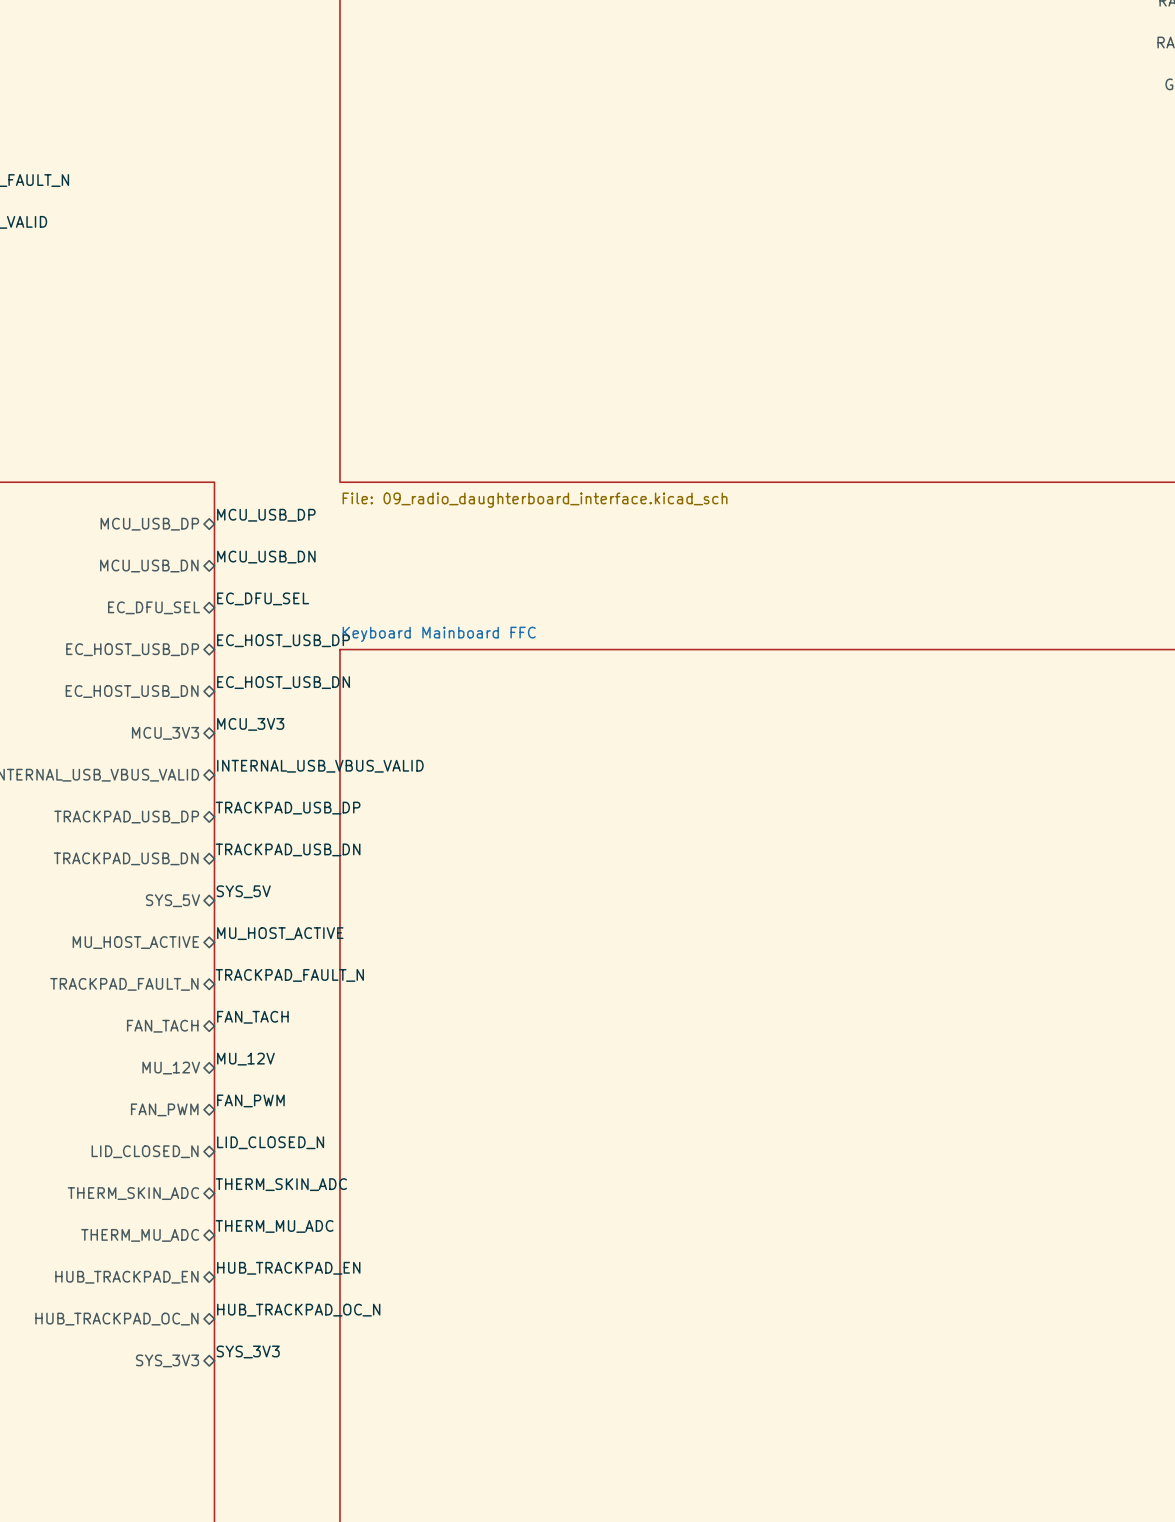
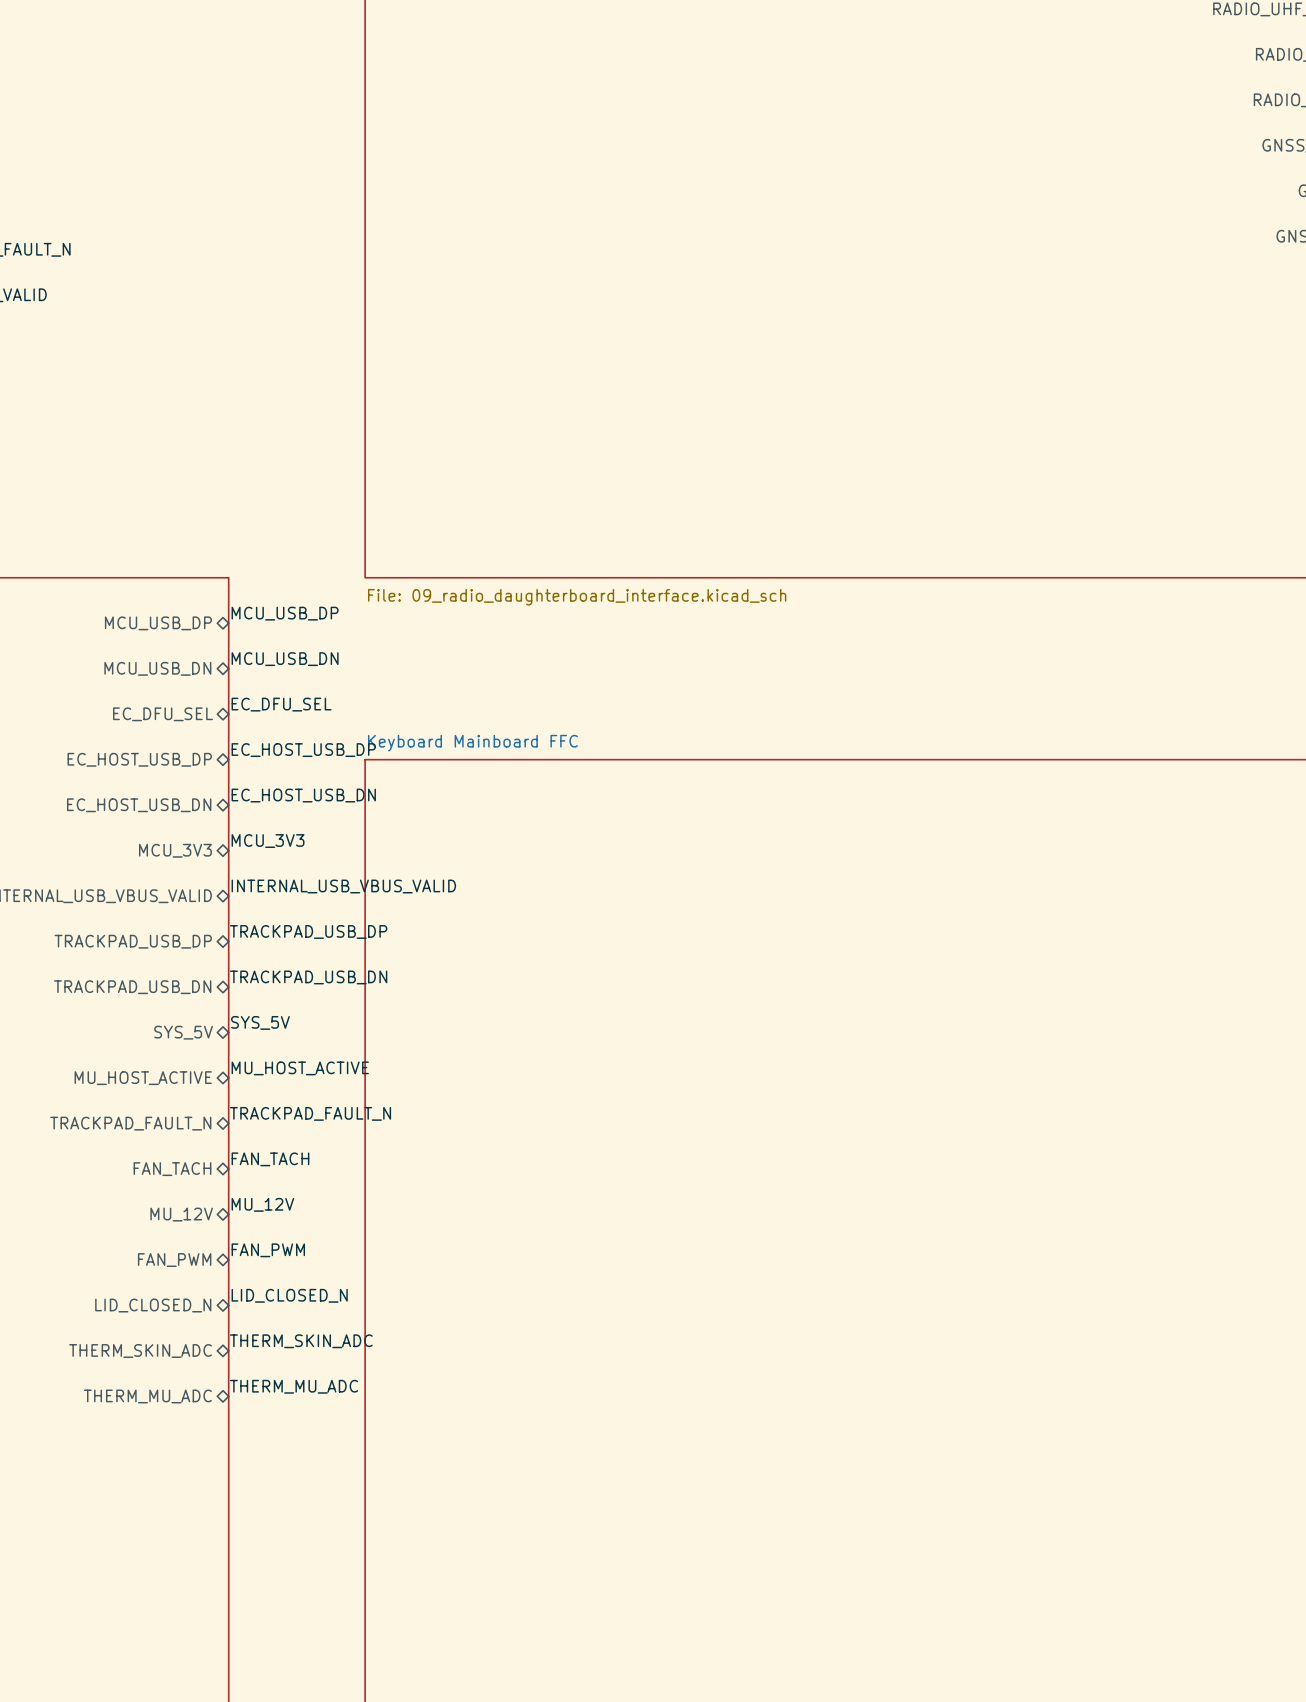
label: HUB_TRACKPAD_EN (288, 1268) -> none
sheet pin: HUB_TRACKPAD_EN (126, 1277) -> none
label: HUB_TRACKPAD_OC_N (298, 1310) -> none
sheet pin: HUB_TRACKPAD_OC_N (116, 1319) -> none
label: SYS_3V3 (248, 1351) -> none
sheet pin: SYS_3V3 (167, 1360) -> none

